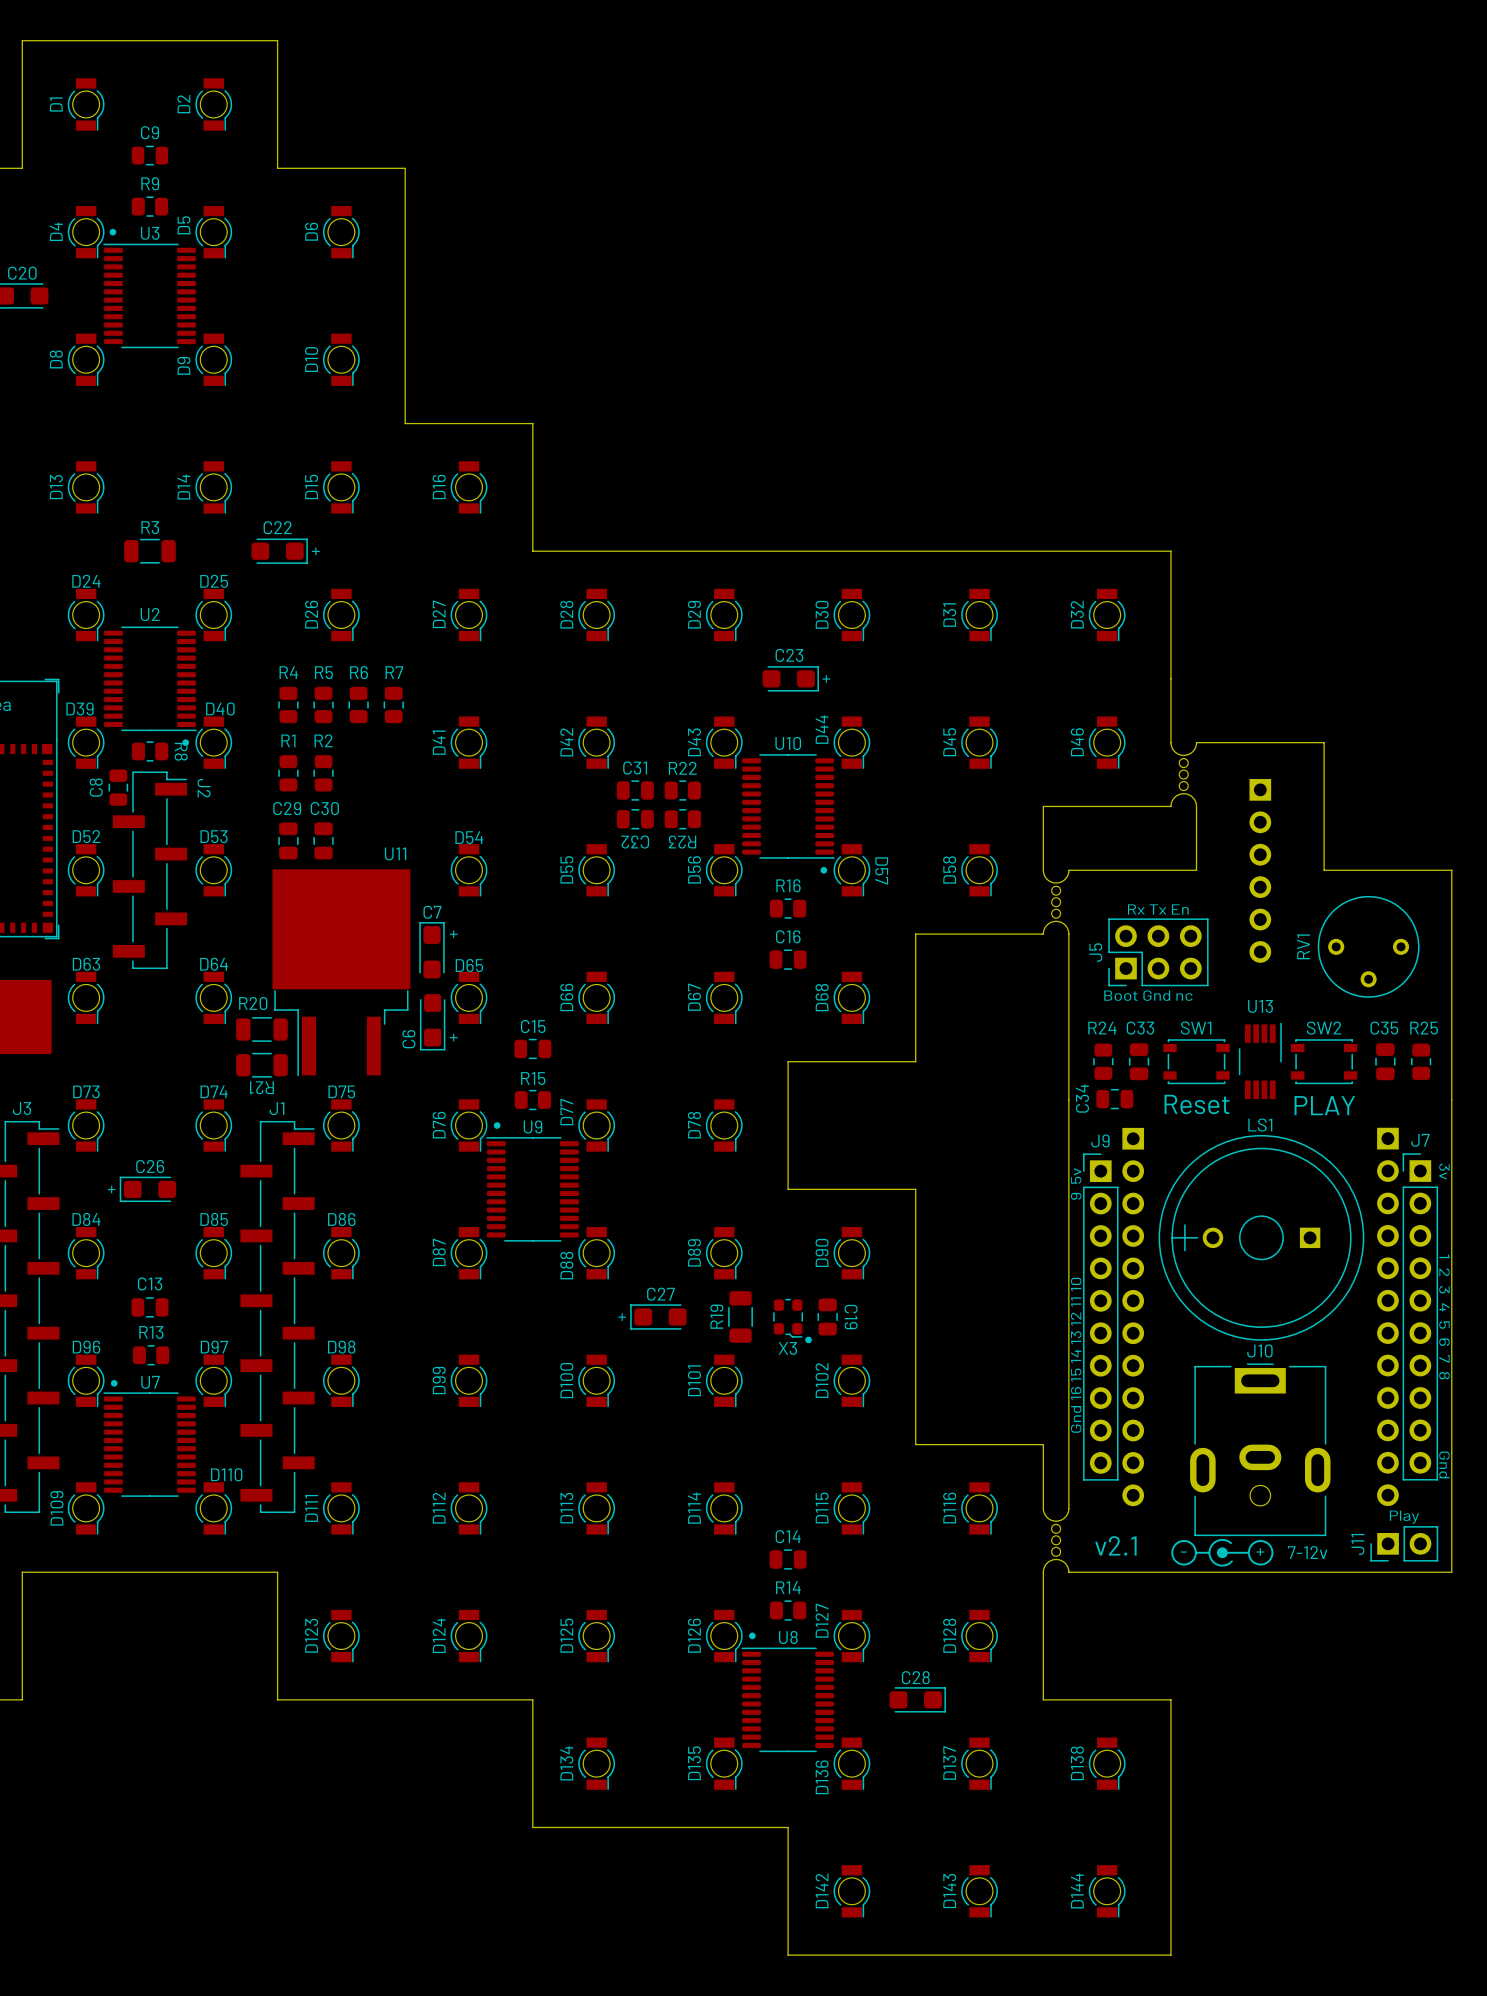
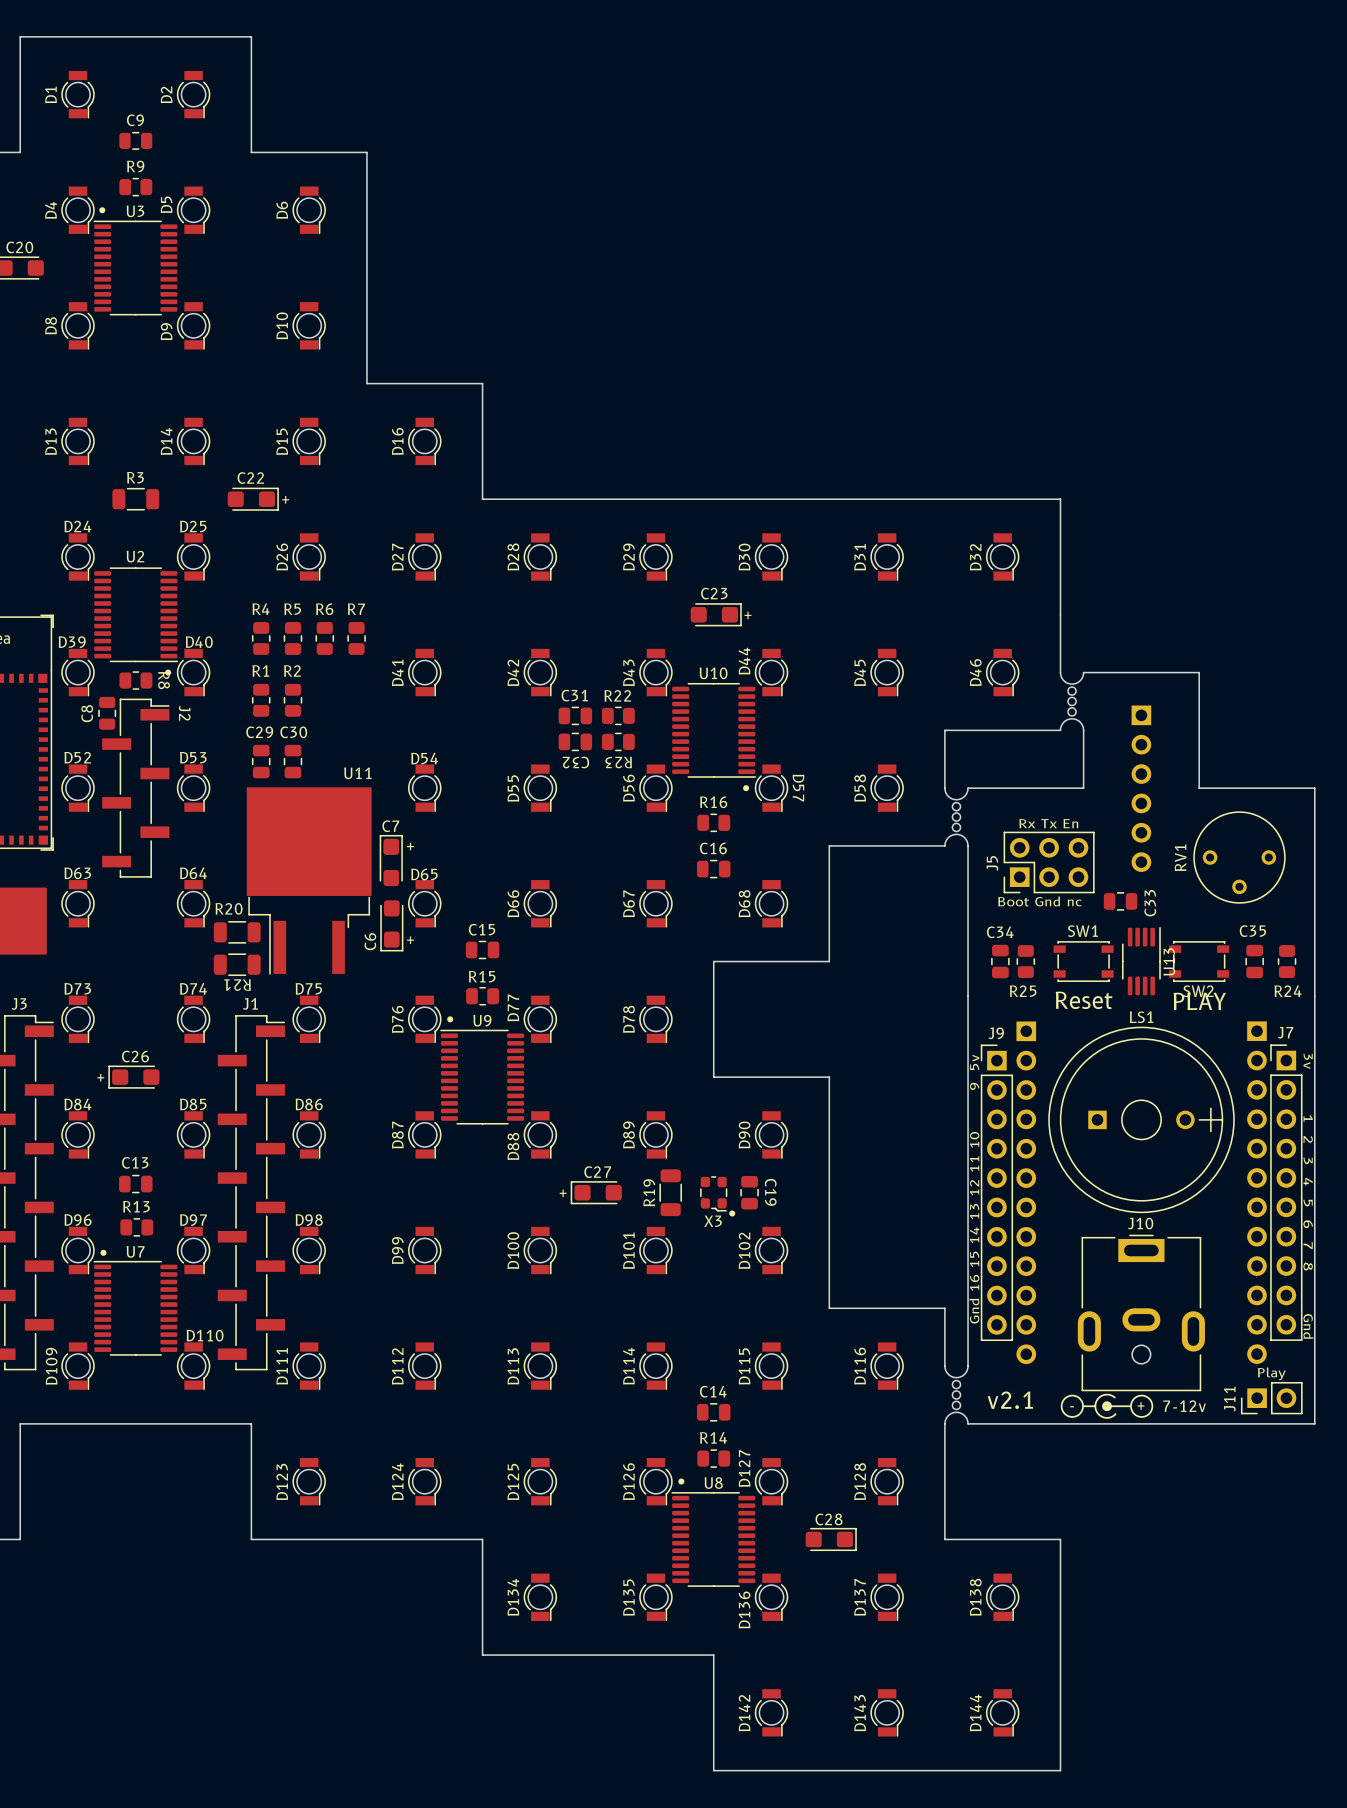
U13 name position: U13 (1260, 1006) -> U13 (1169, 961)
U13 footprint: [1238, 1022, 1282, 1100] -> [1122, 927, 1161, 996]
SW2 name position: SW2 (1324, 1028) -> SW2 (1198, 991)
R25 name: R25 (1424, 1028) -> R24 (1288, 991)
R24: (1103, 1061) -> none
R25: none -> (1025, 961)
C33 rotation: 0° (1139, 1061) -> 90° clockwise (1120, 901)
C33 position: (1139, 1061) -> (1120, 901)
C34 rotation: 0° (1114, 1099) -> 90° clockwise (1000, 961)
C34 position: (1114, 1099) -> (1000, 961)
LS1 rotation: 0° (1261, 1237) -> 180° (1141, 1119)

